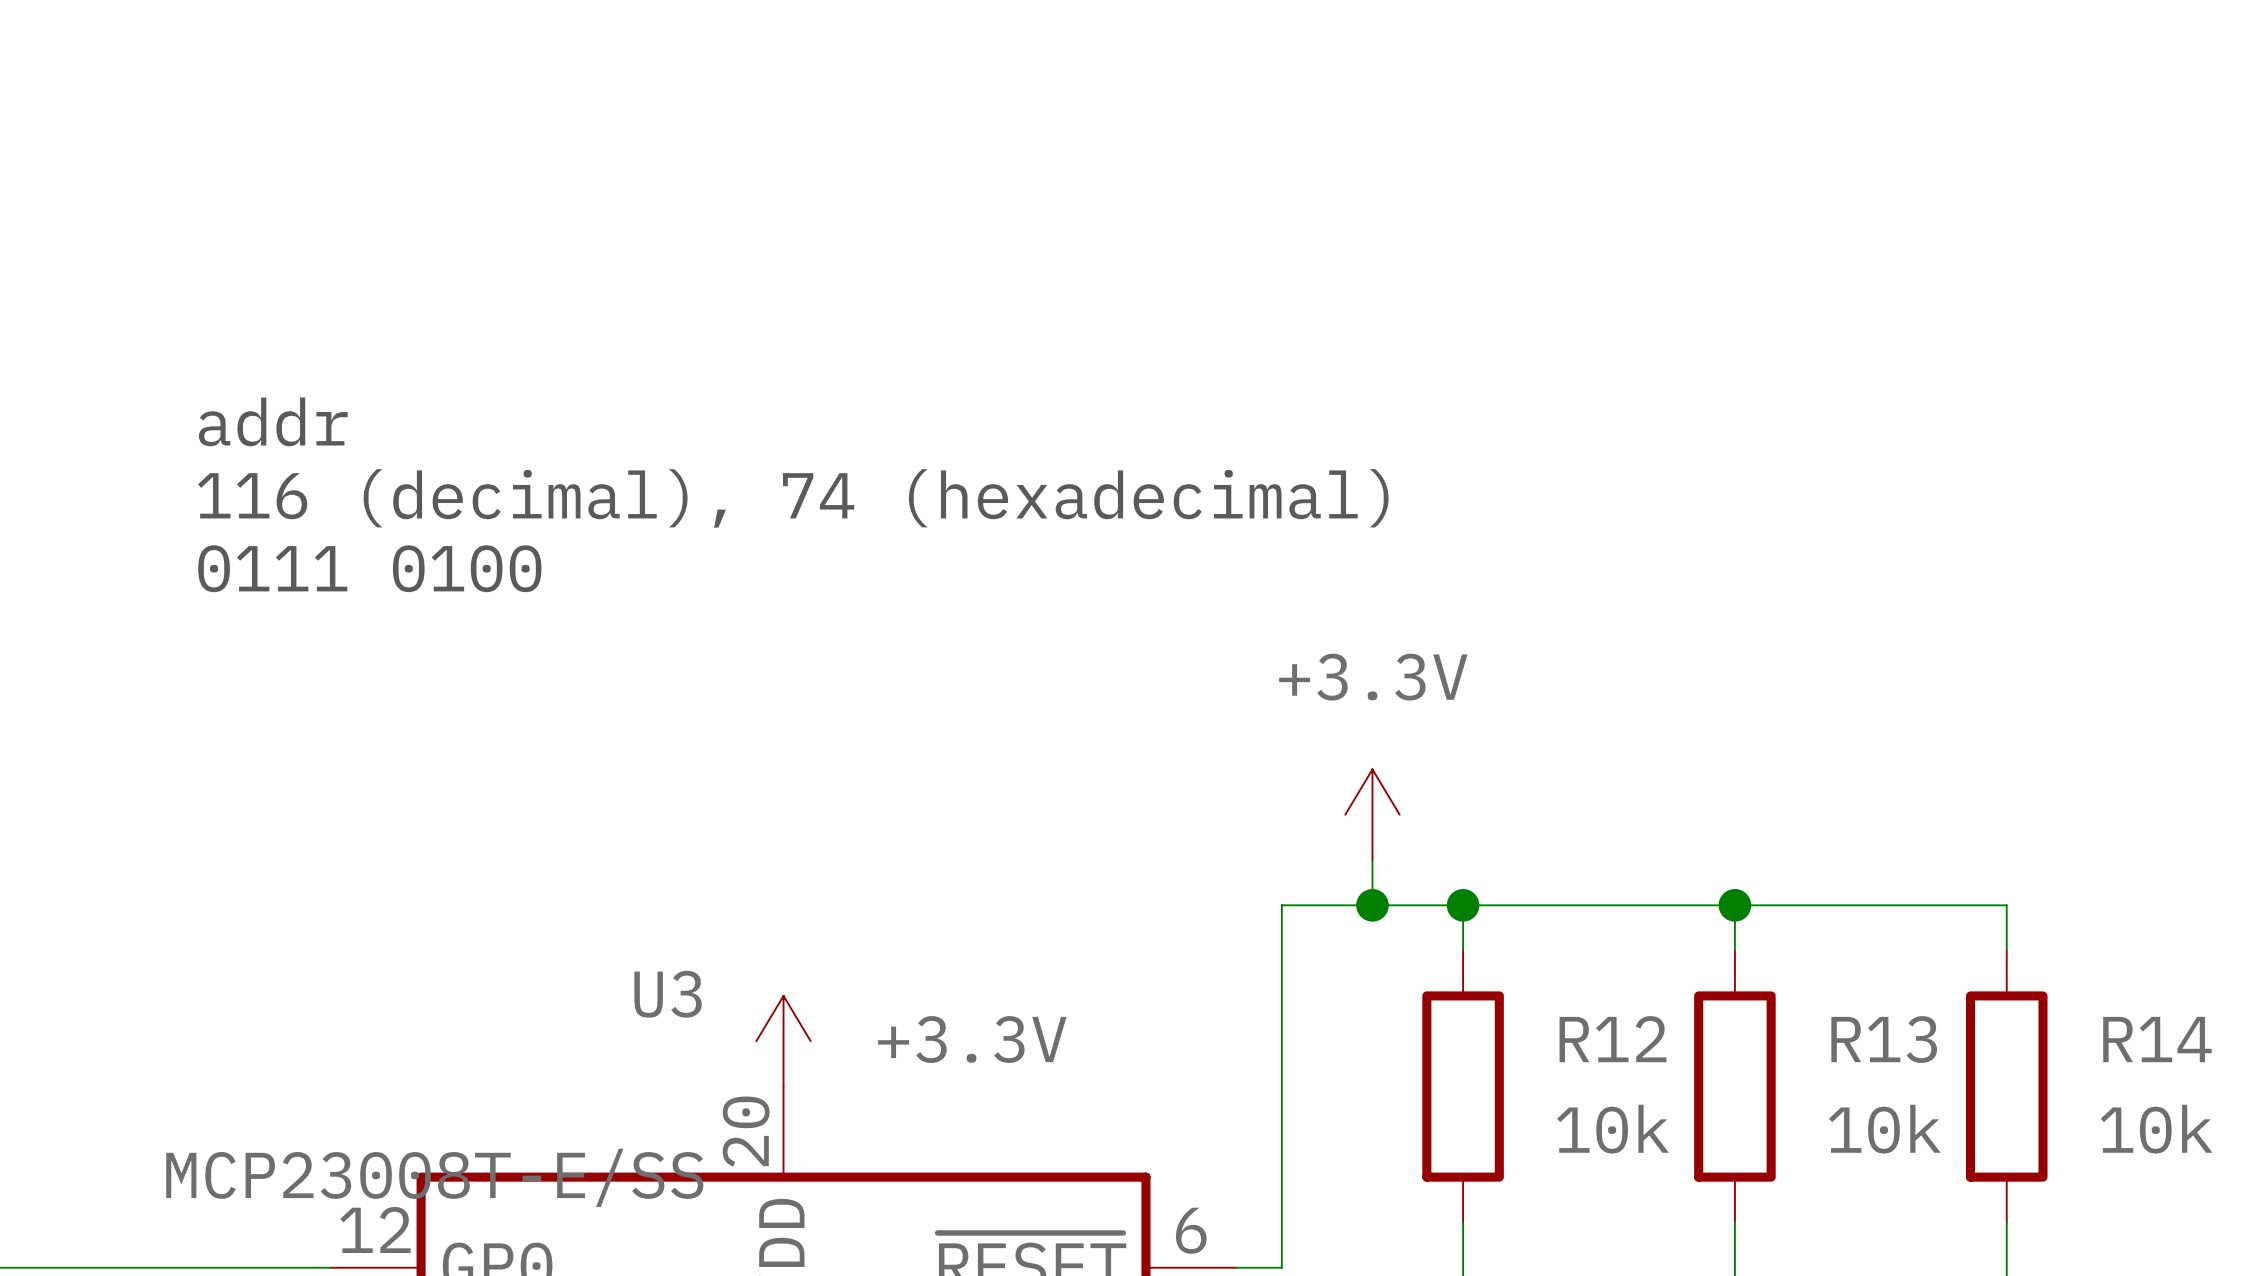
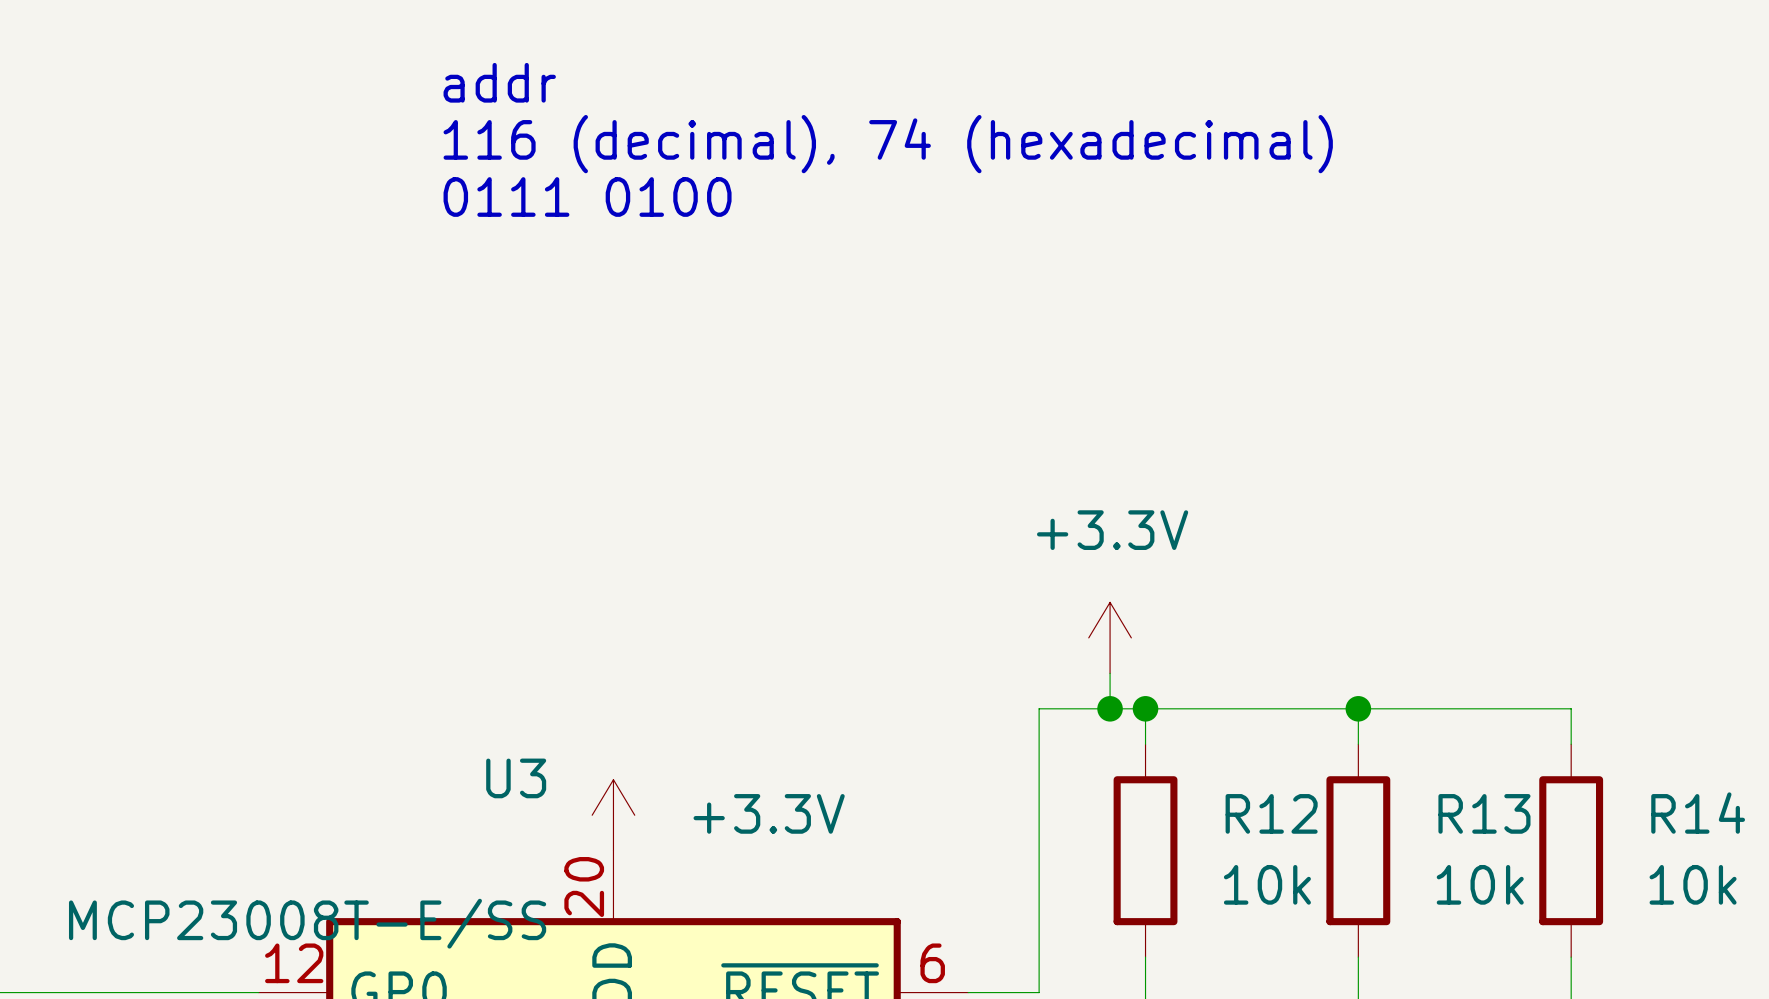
text position: addr (273, 421) -> addr (499, 82)
text position: 116 (decimal), 74 (hexadecimal) (793, 498) -> 116 (decimal), 74 (hexadecimal) (888, 144)
text position: 0111 0100 (369, 568) -> 0111 0100 (587, 197)
power symbol position: +3.3V (1372, 814) -> +3.3V (1110, 637)
wire: (1372, 860) (1372, 905) -> (1110, 673) (1110, 708)
wire: (1327, 905) (1281, 905) (1281, 1267) -> (1039, 708) (1039, 992) (1003, 992)
junction position: (1372, 905) -> (1110, 708)

